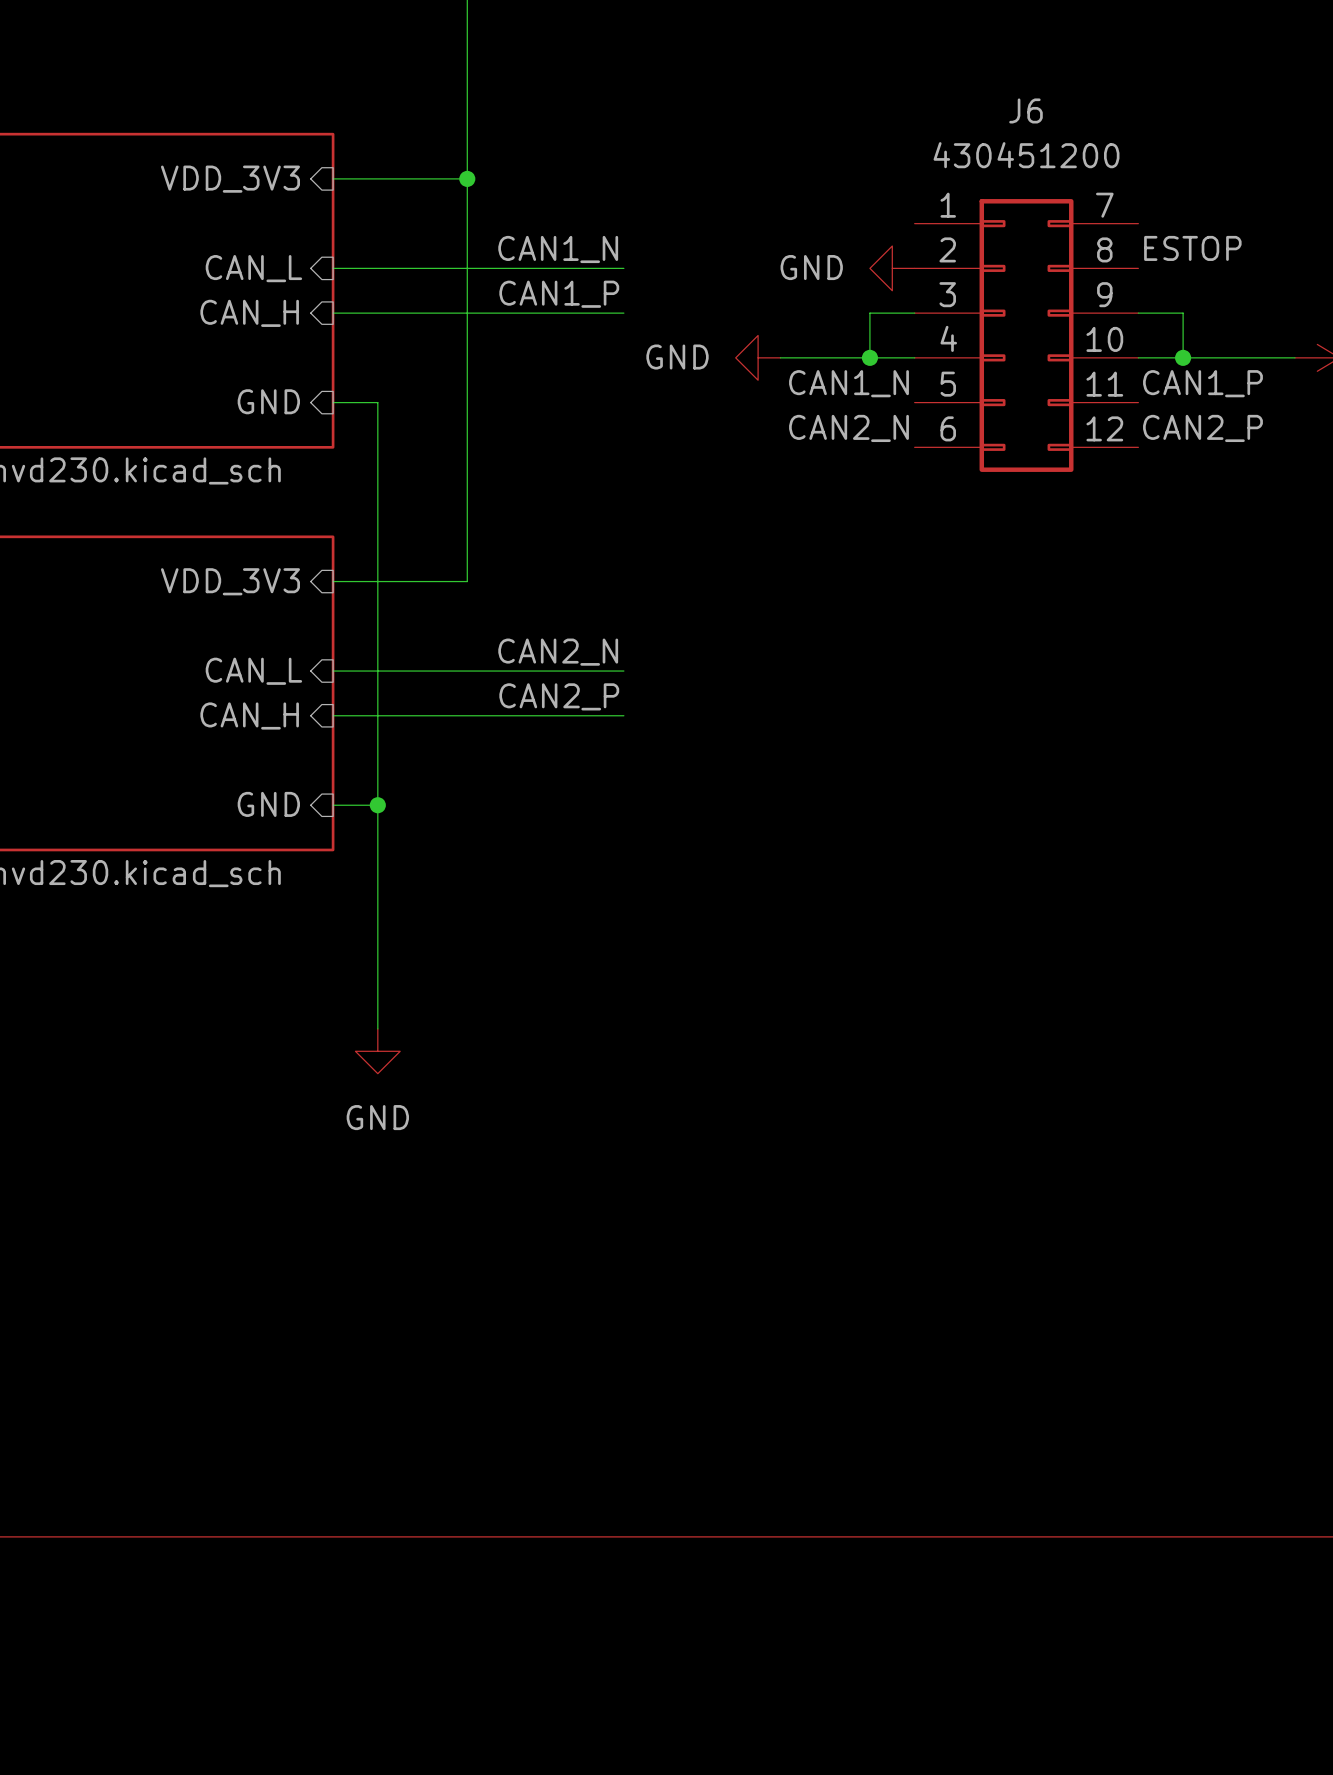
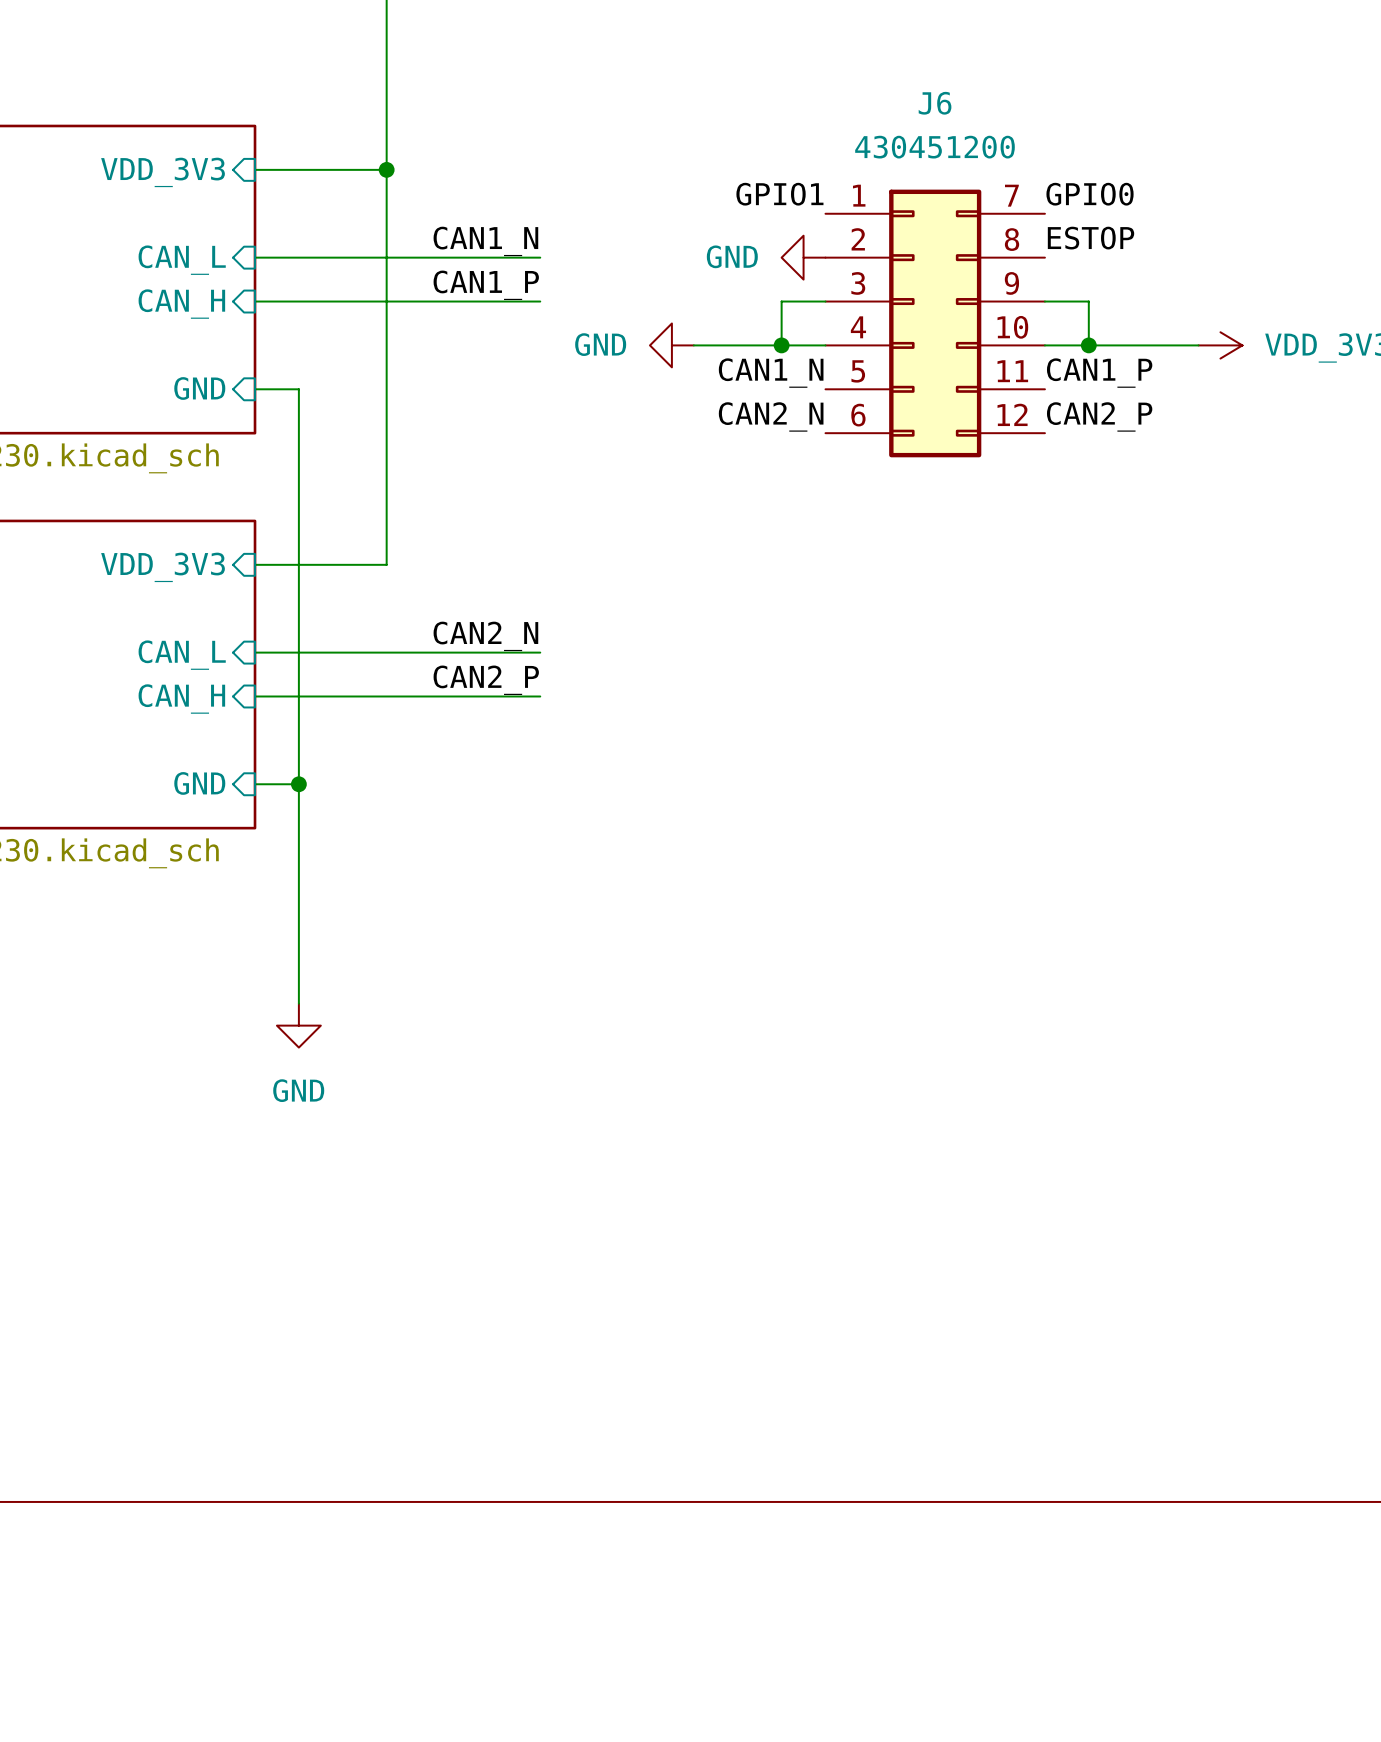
label: none -> GPIO1 (779, 194)
label: none -> GPIO0 (1090, 194)

